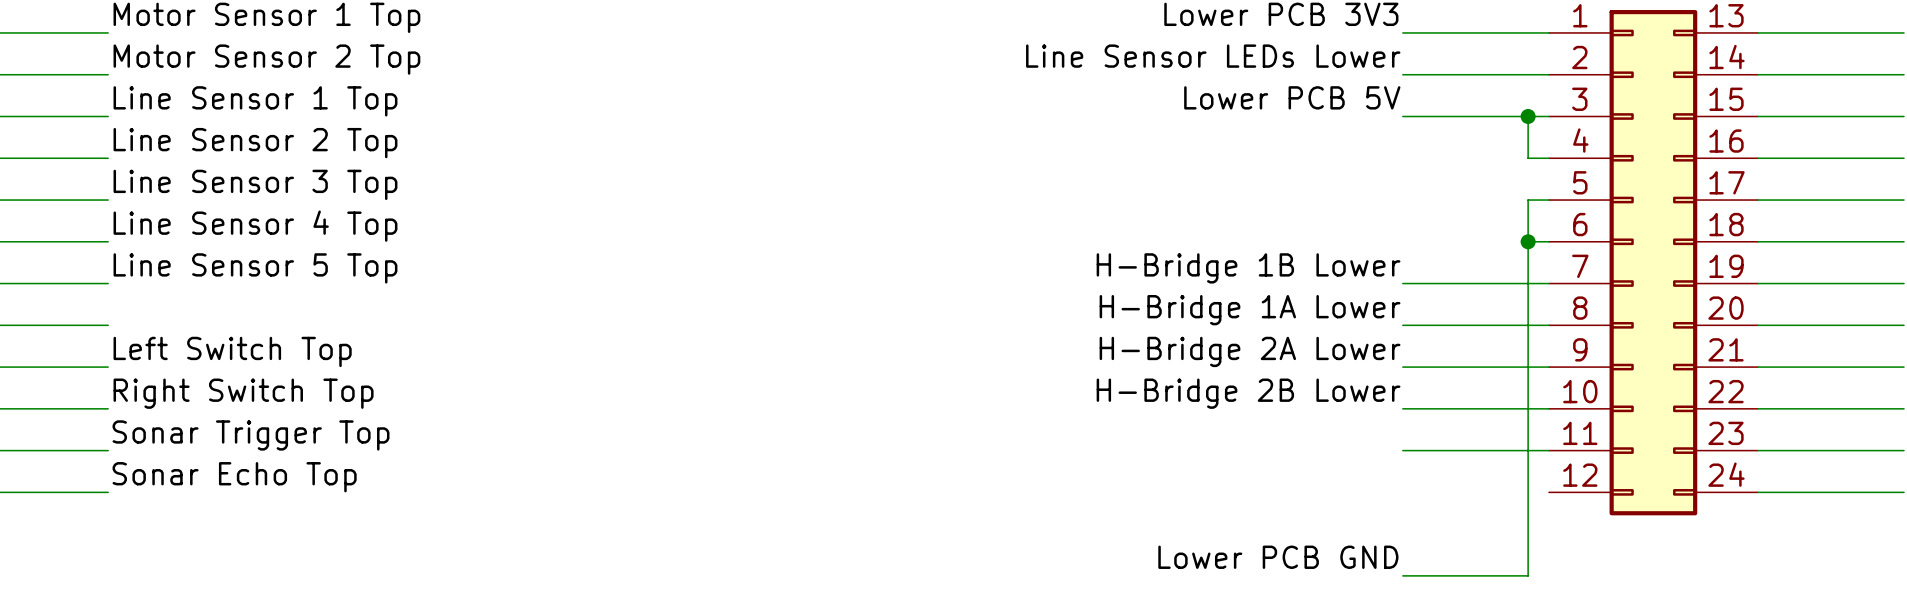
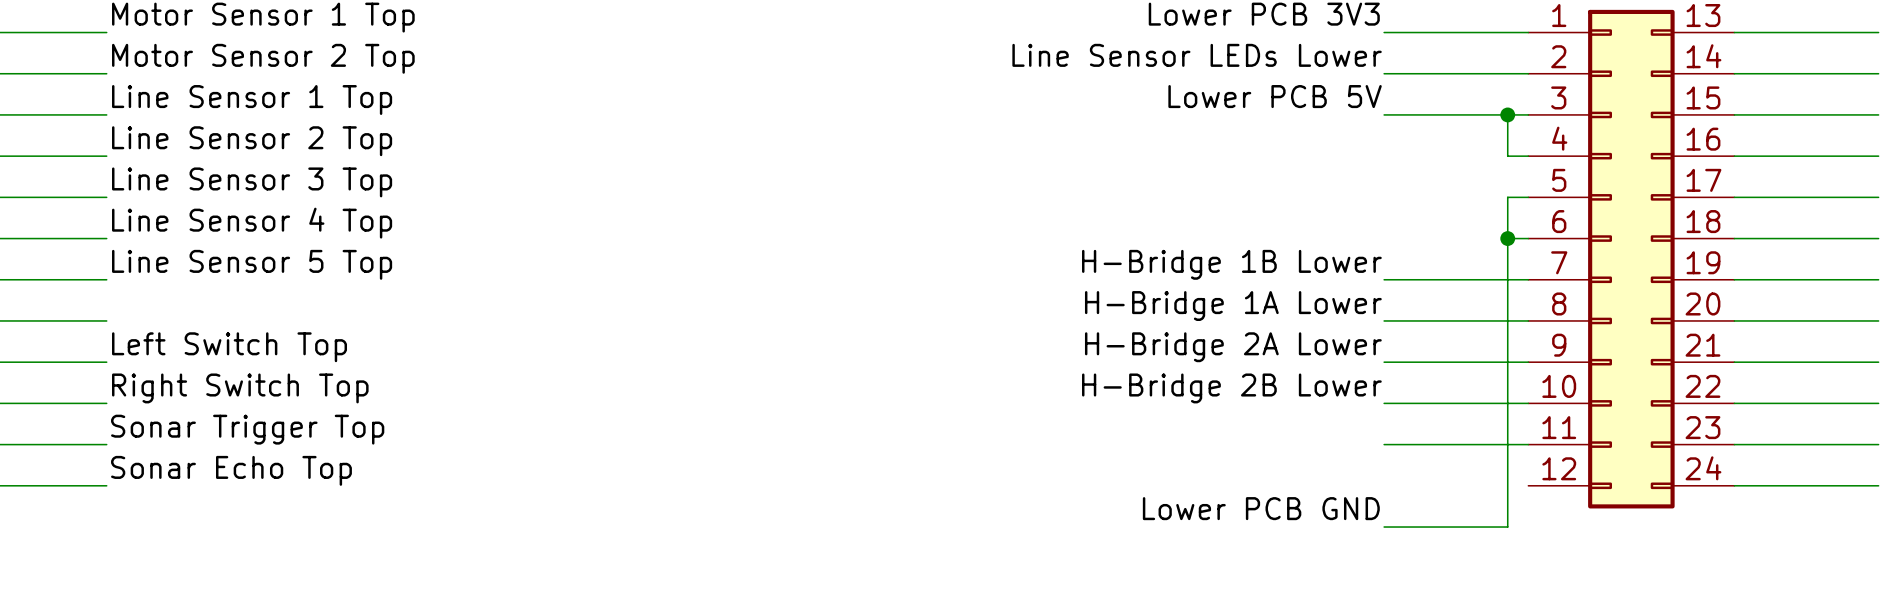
wire: (1528, 534) (1528, 575) (1402, 575) -> (1507, 527) (1384, 527)
label position: Lower PCB GND (1278, 557) -> Lower PCB GND (1261, 508)

